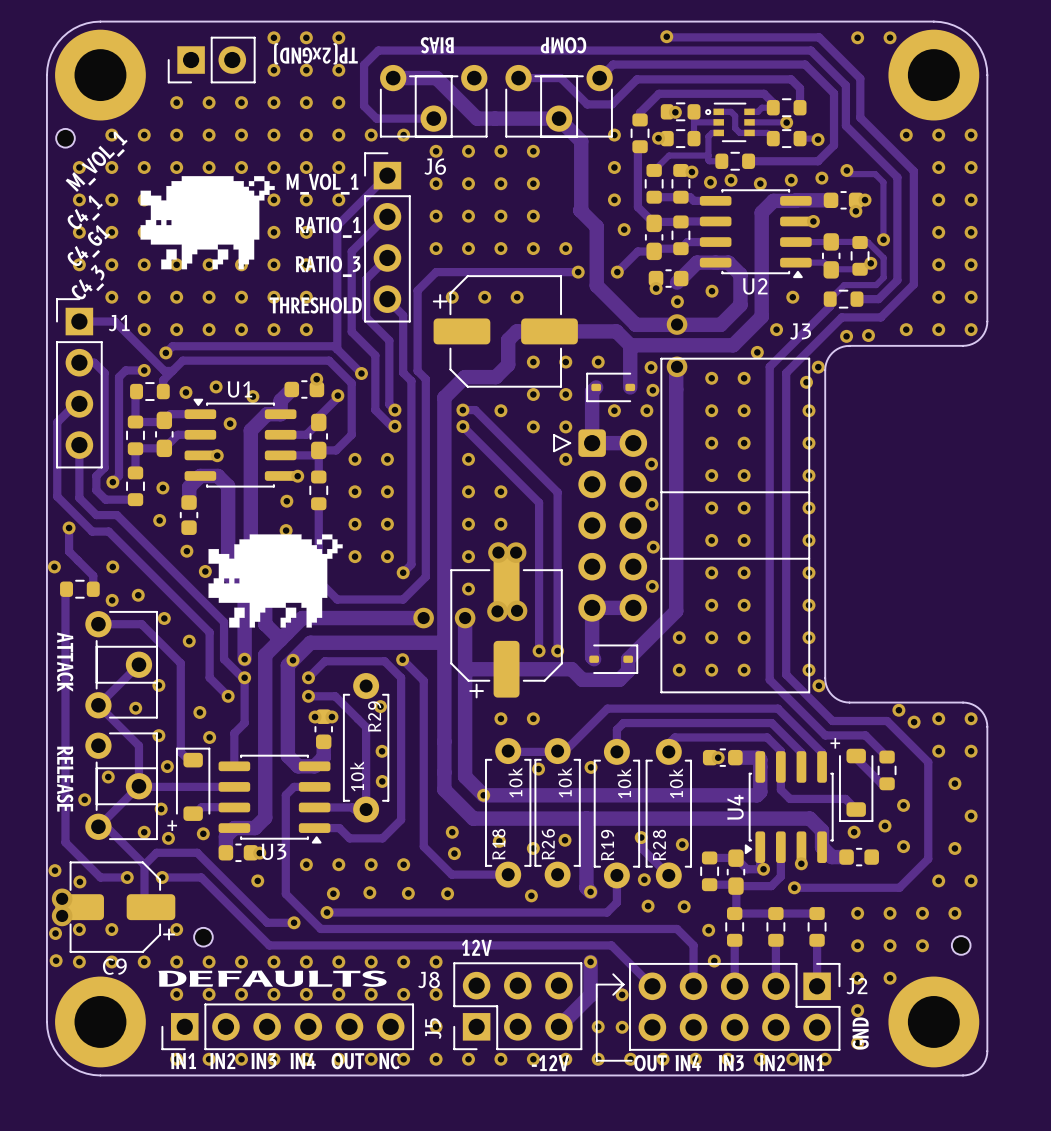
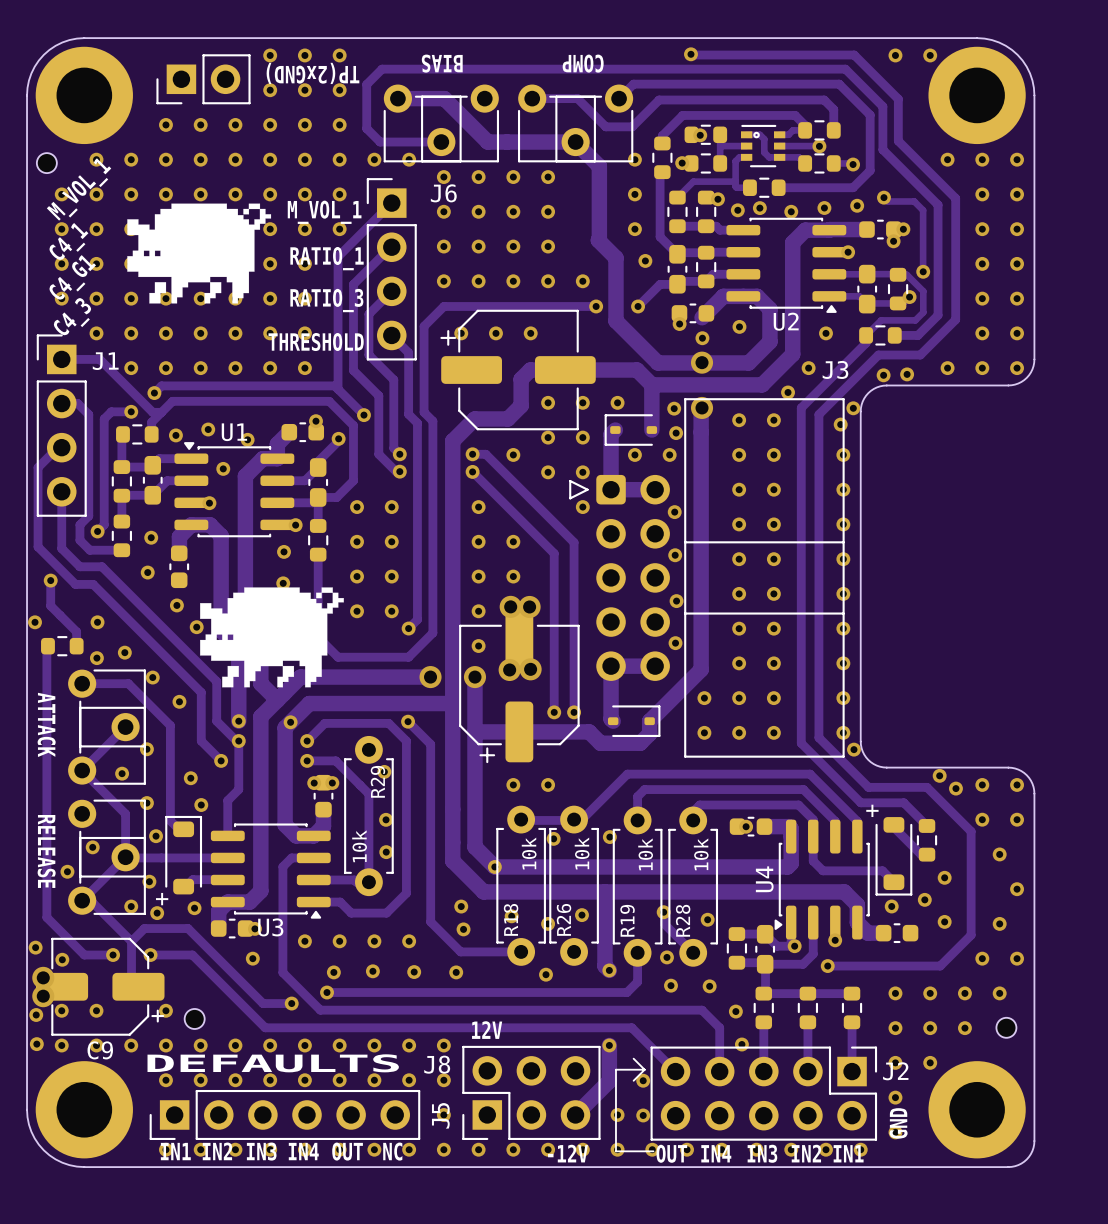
part footprint: [705, 102, 755, 143] -> [741, 124, 786, 168]

